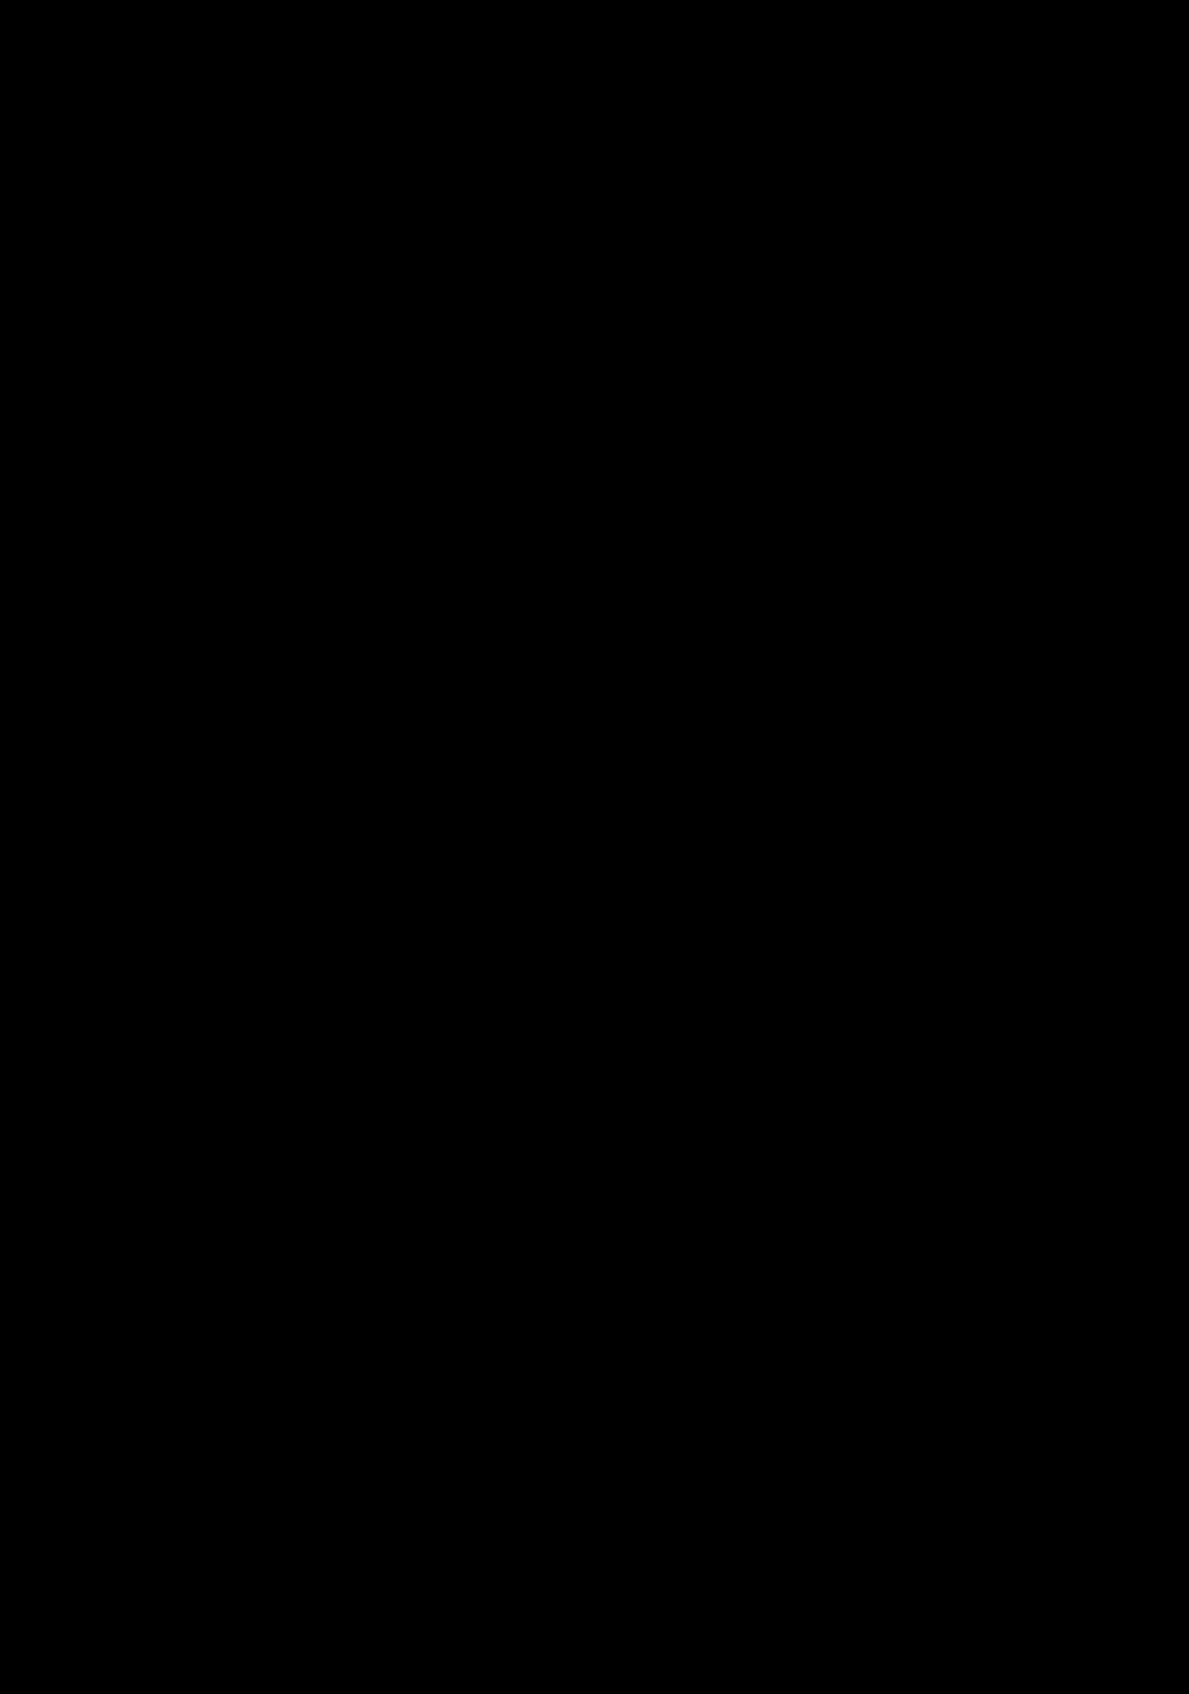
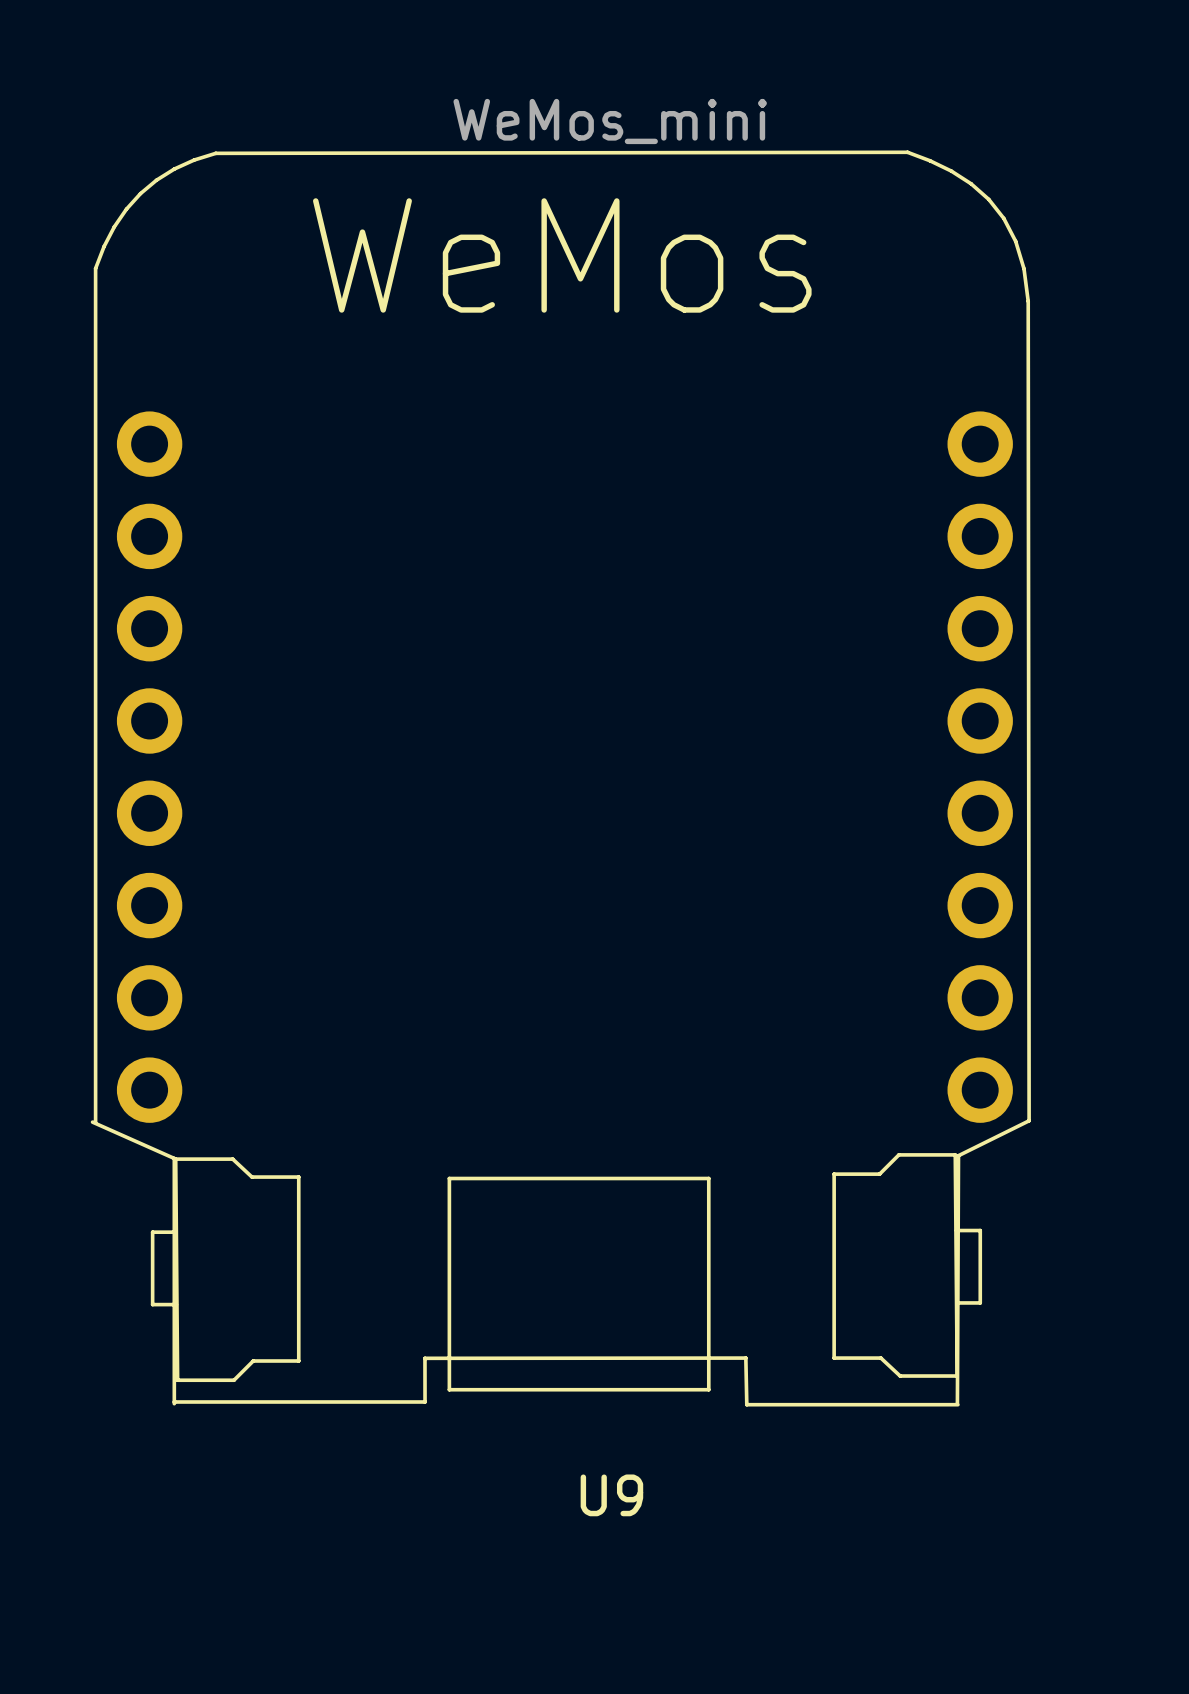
U9: none -> WeMos_mini (560, 778)

